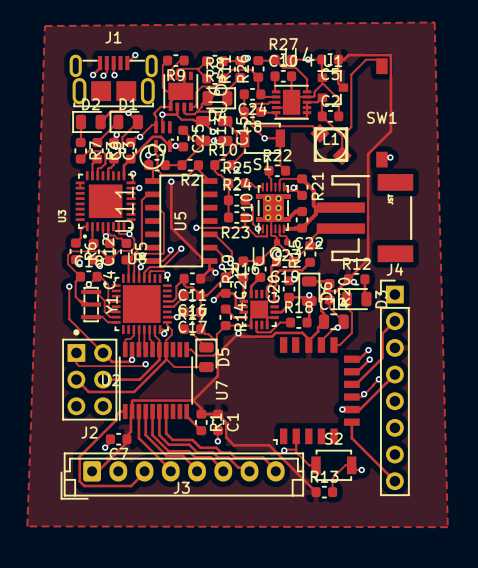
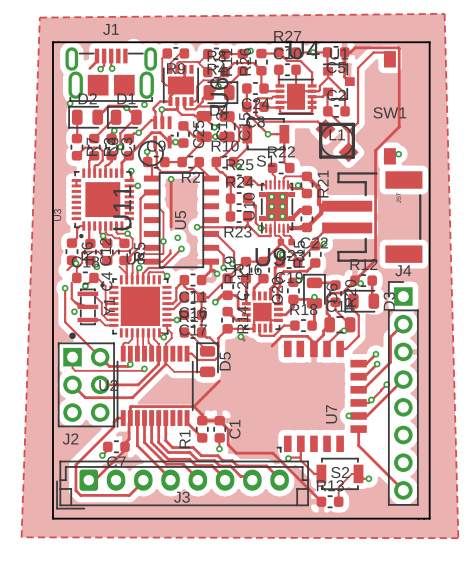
board edge: none -> (52, 42) (52, 518) (429, 518) (429, 42) (52, 42)
track: (135, 55) (127, 63) -> none
via: (135, 55) -> none
via: (93, 74) -> none
via: none -> (70, 103)
via: none -> (144, 104)
track: (171, 227) (204, 261) -> none
via: none -> (177, 237)
via: none -> (163, 241)
via: (170, 250) -> none
track: (86, 251) (71, 251) (67, 255) (67, 264) (80, 276) (75, 281) -> (83, 251) (82, 262) (76, 268) (76, 277)
track: none -> (72, 260) (71, 265) (67, 270)
track: none -> (119, 266) (126, 273)
via: none -> (74, 311)
track: (277, 332) (272, 336) (241, 336) -> (281, 336) (272, 345)
track: (238, 333) (222, 349) (222, 352) (217, 357) (217, 376) -> none
U7 name position: U7 (221, 390) -> U7 (331, 414)
R1 name position: R1 (215, 422) -> R1 (184, 439)
J2 name position: J2 (89, 432) -> J2 (70, 439)
S2 name position: S2 (333, 438) -> S2 (340, 472)

